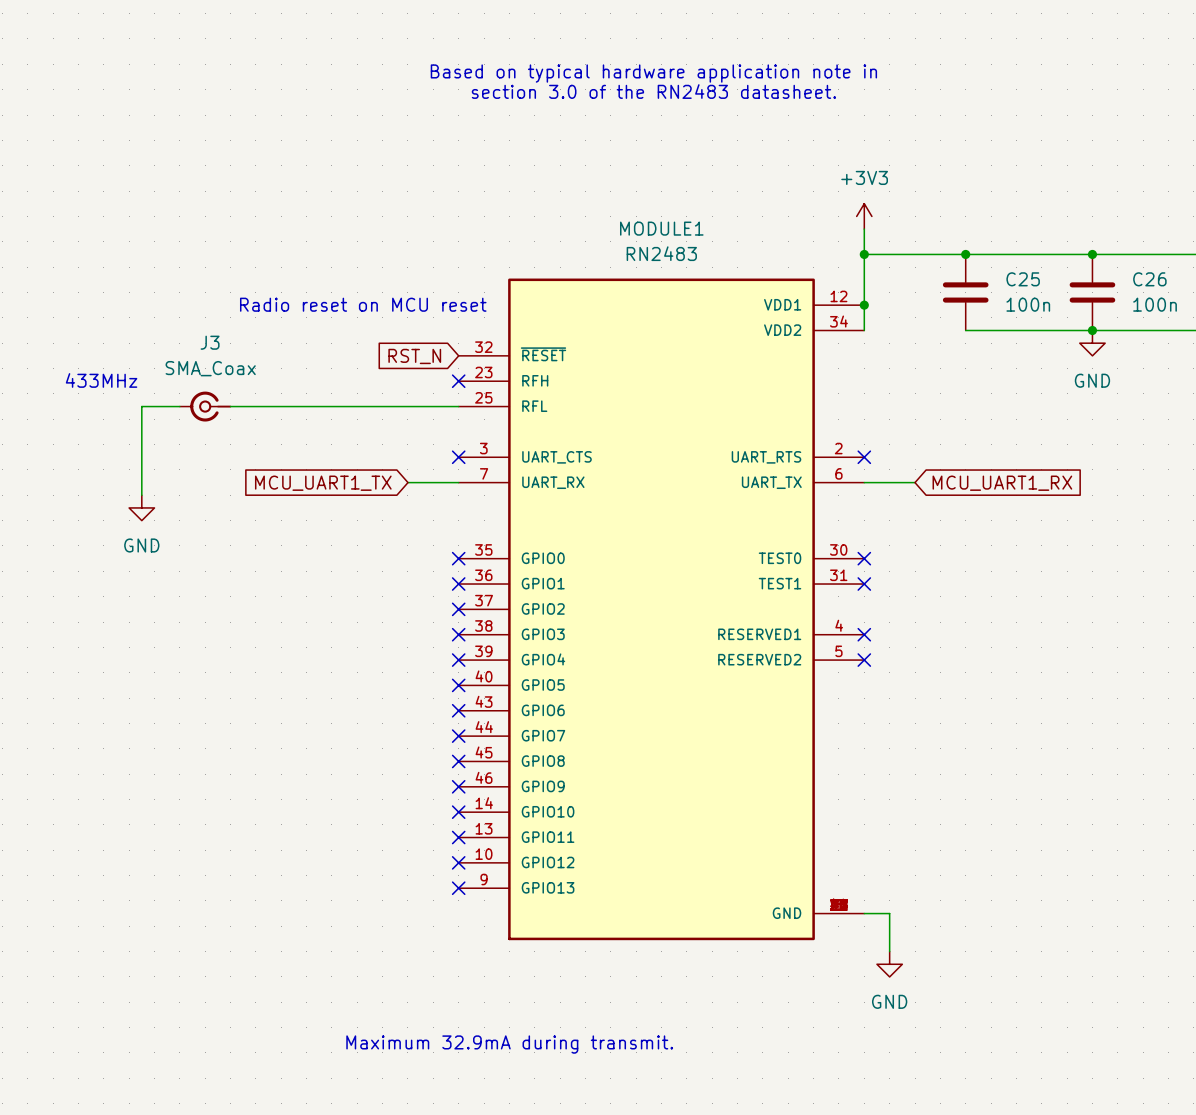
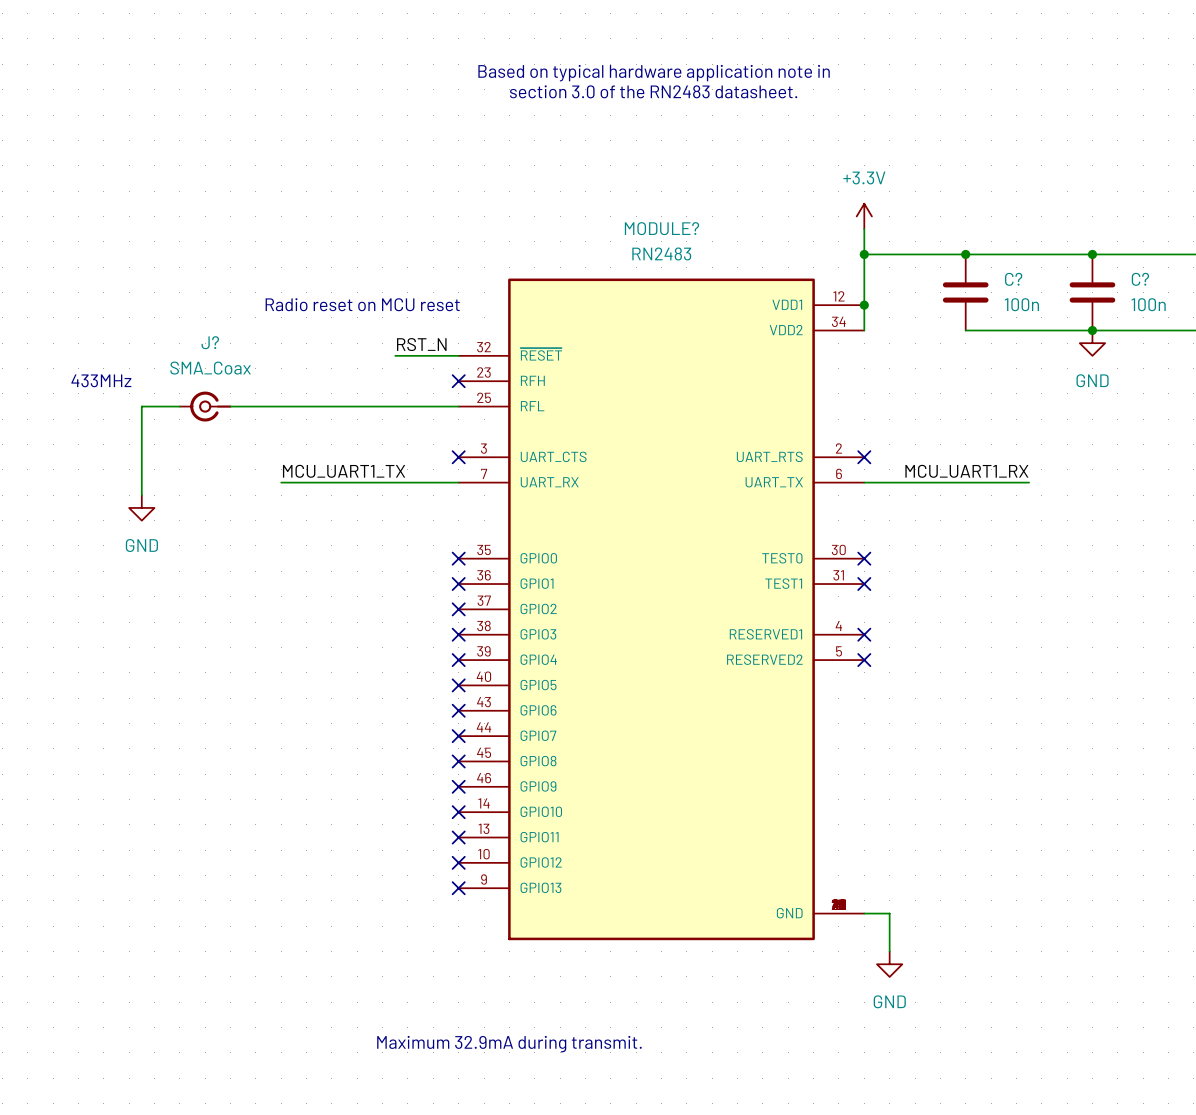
power symbol: +3V3 (864, 216) -> +3.3V (864, 216)
MODULE1 name: MODULE1 (661, 228) -> MODULE? (661, 228)
C25 name: C25 (1023, 279) -> C? (1013, 279)
C26 name: C26 (1149, 279) -> C? (1140, 279)
J3 name: J3 (210, 342) -> J? (210, 342)
label: none -> RST_N (421, 344)
wire: none -> (395, 355) (458, 355)
global label: RST_N (414, 356) -> none
label: none -> MCU_UART1_TX (344, 471)
label: none -> MCU_UART1_RX (966, 471)
wire: none -> (281, 482) (407, 482)
wire: none -> (915, 482) (1029, 482)
global label: MCU_UART1_TX (323, 483) -> none
global label: MCU_UART1_RX (1002, 483) -> none

